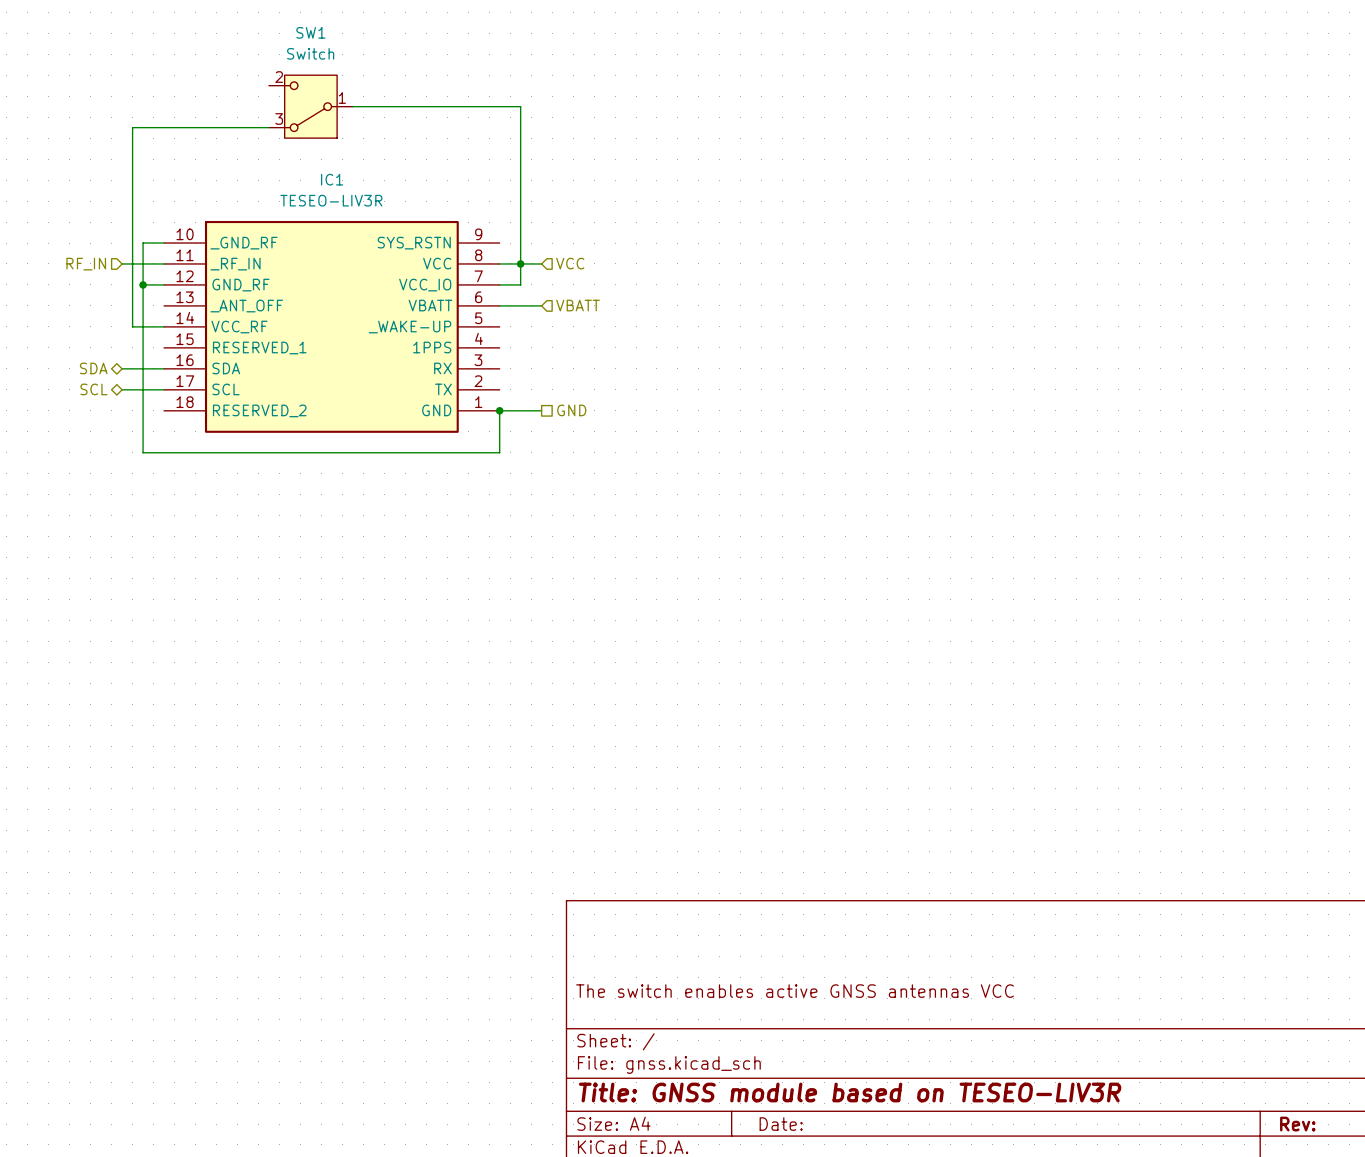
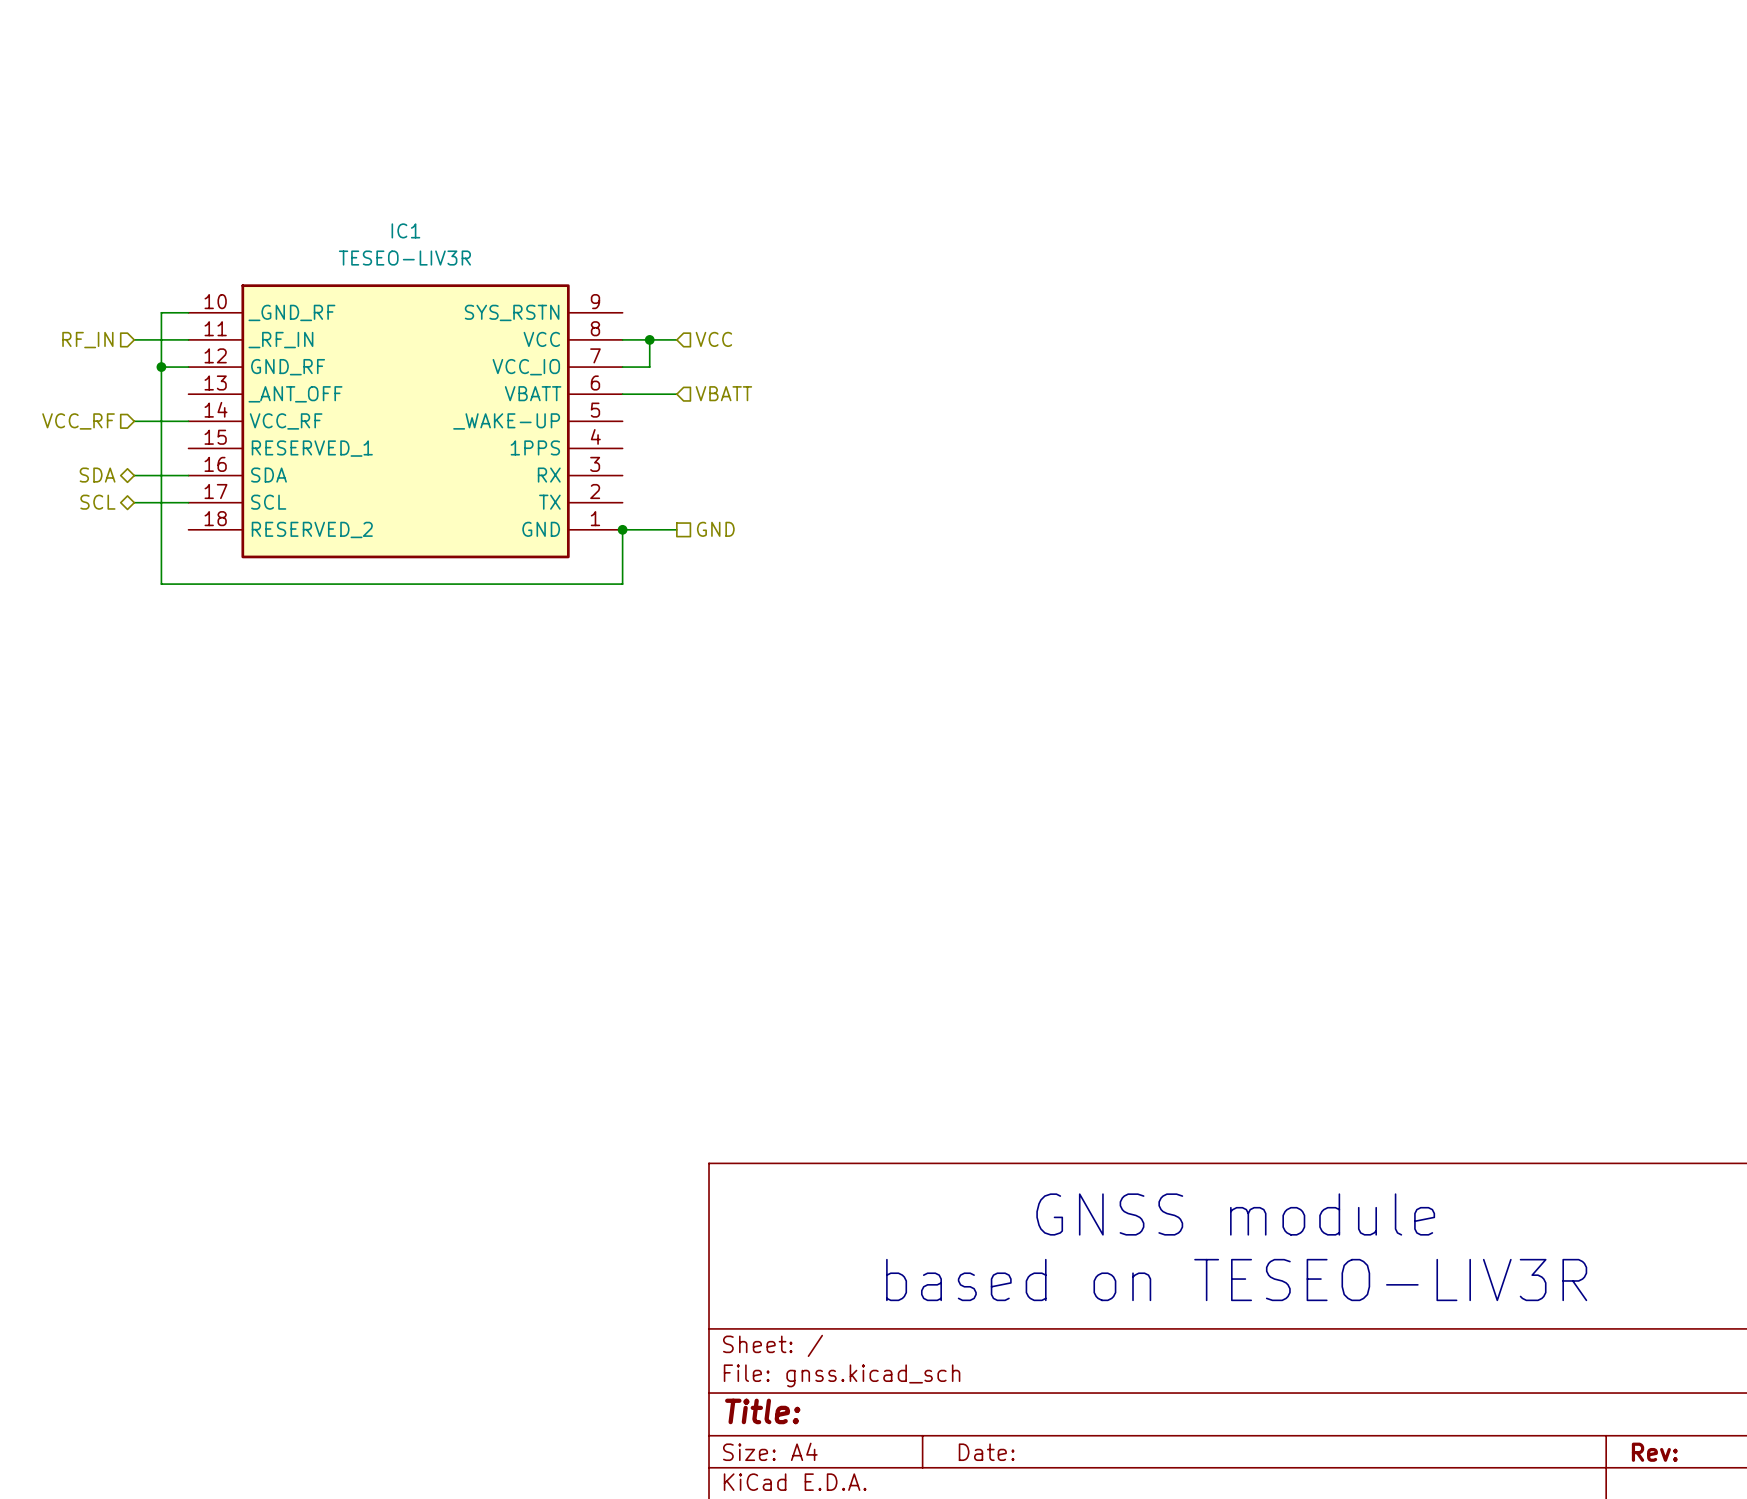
SW1: Switch (310, 106) -> none
wire: (352, 106) (520, 106) (520, 263) -> none
wire: (268, 127) (132, 127) (132, 326) -> (134, 421) (147, 421)
hierarchical label: none -> VCC_RF (78, 421)
text: none -> GNSS module (1235, 1214)
text: none -> based on TESEO-LIV3R (1236, 1280)
title block: The switch enables active GNSS antennas VCC (795, 991) -> none
title block: Title: GNSS module based on TESEO-LIV3R (850, 1092) -> Title: (762, 1411)

